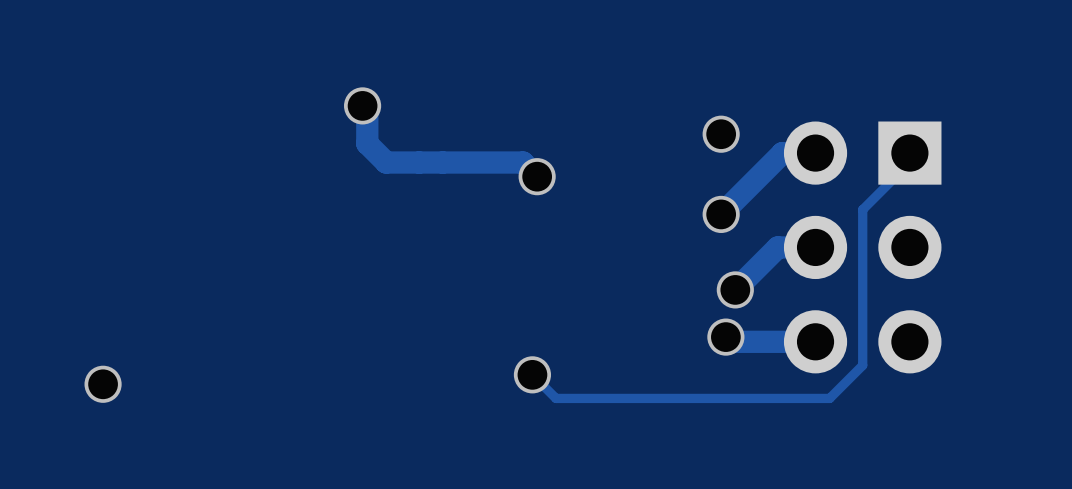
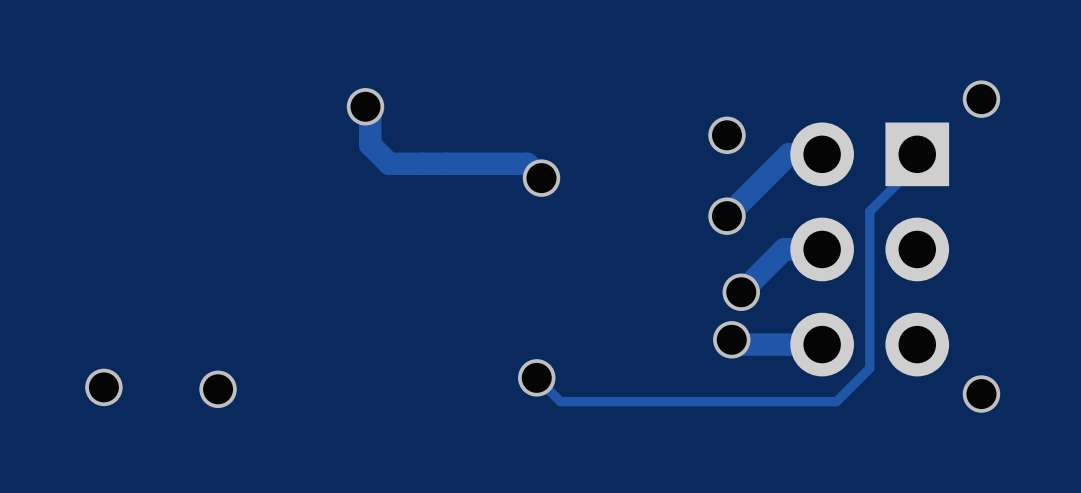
via: none -> (981, 99)
via: none -> (218, 389)
via: none -> (981, 394)

